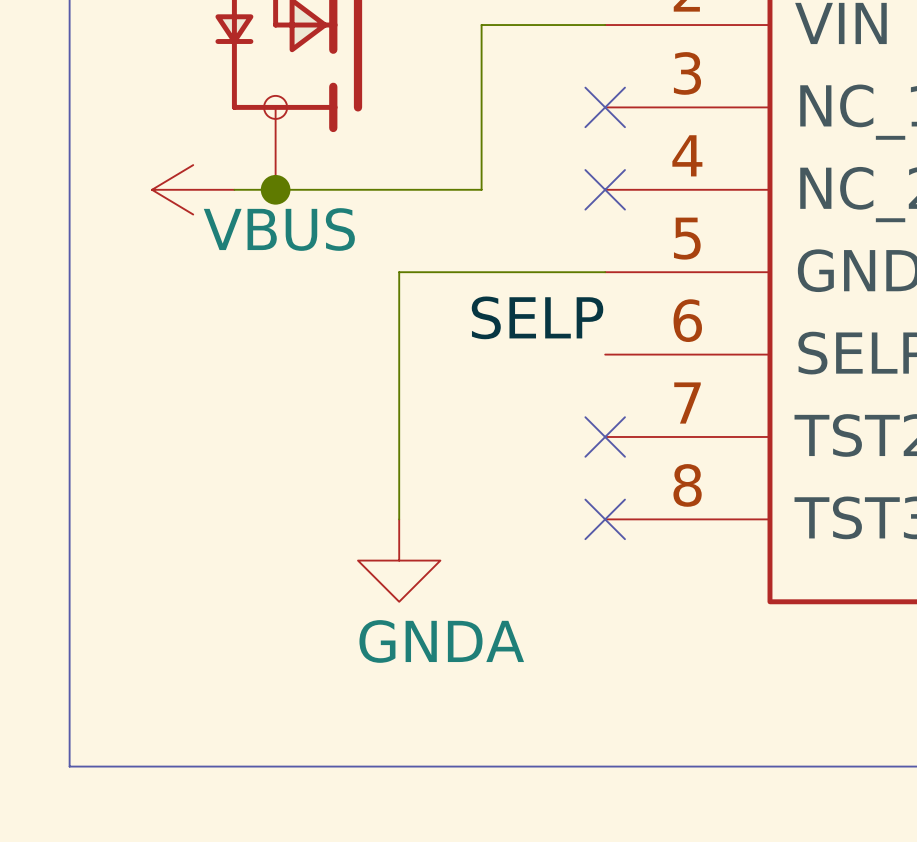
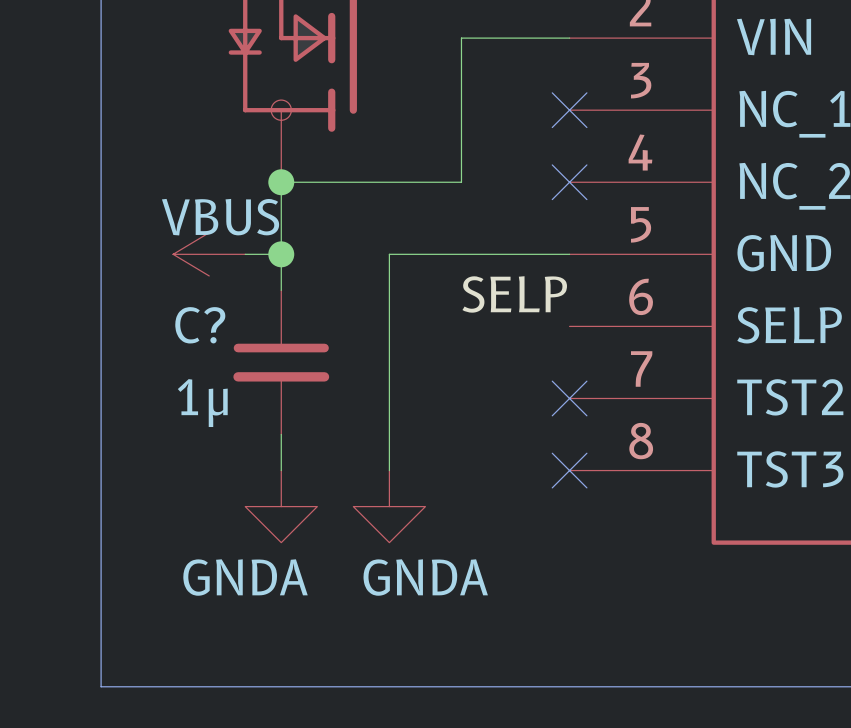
power symbol position: VBUS (193, 189) -> VBUS (209, 254)
wire: (234, 189) (275, 189) -> (281, 290) (281, 182)
power symbol text position: VBUS (279, 229) -> VBUS (220, 217)
wire: none -> (245, 254) (281, 254)
junction: none -> (281, 254)
C?: none -> 1μ (281, 362)
wire: none -> (281, 434) (281, 470)
power symbol: none -> GNDA (281, 506)

